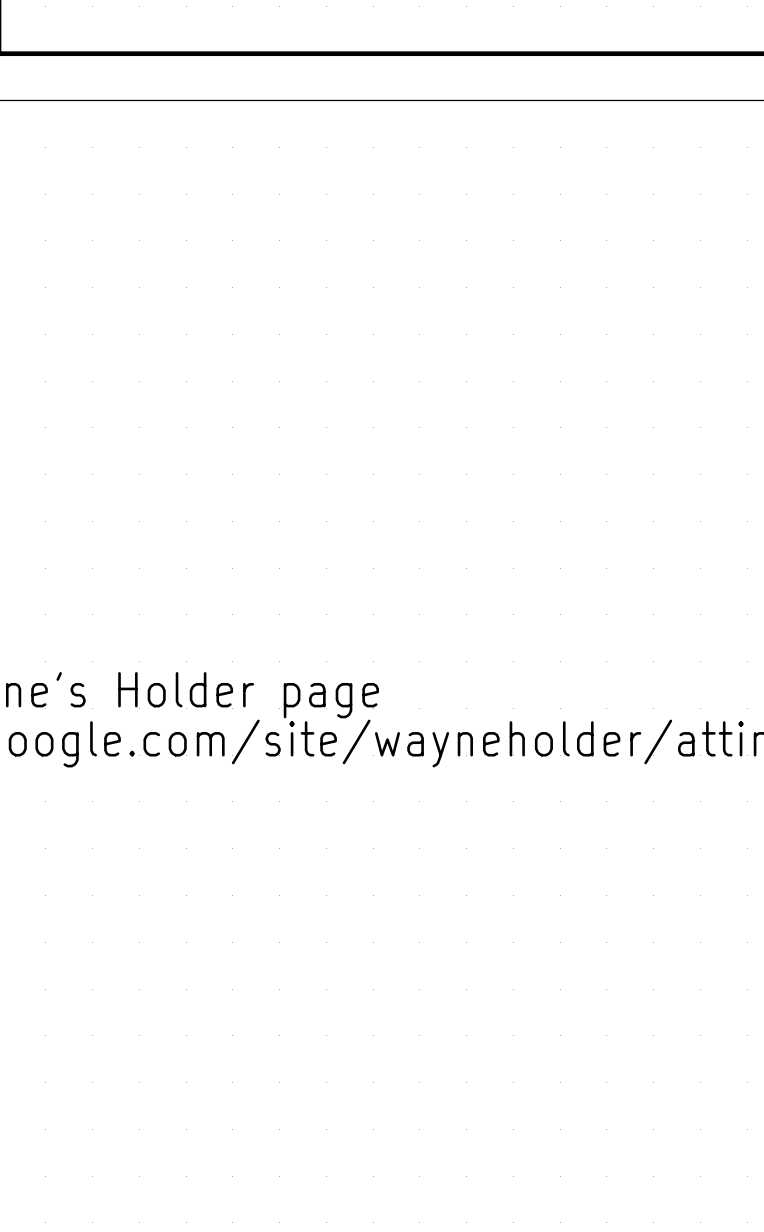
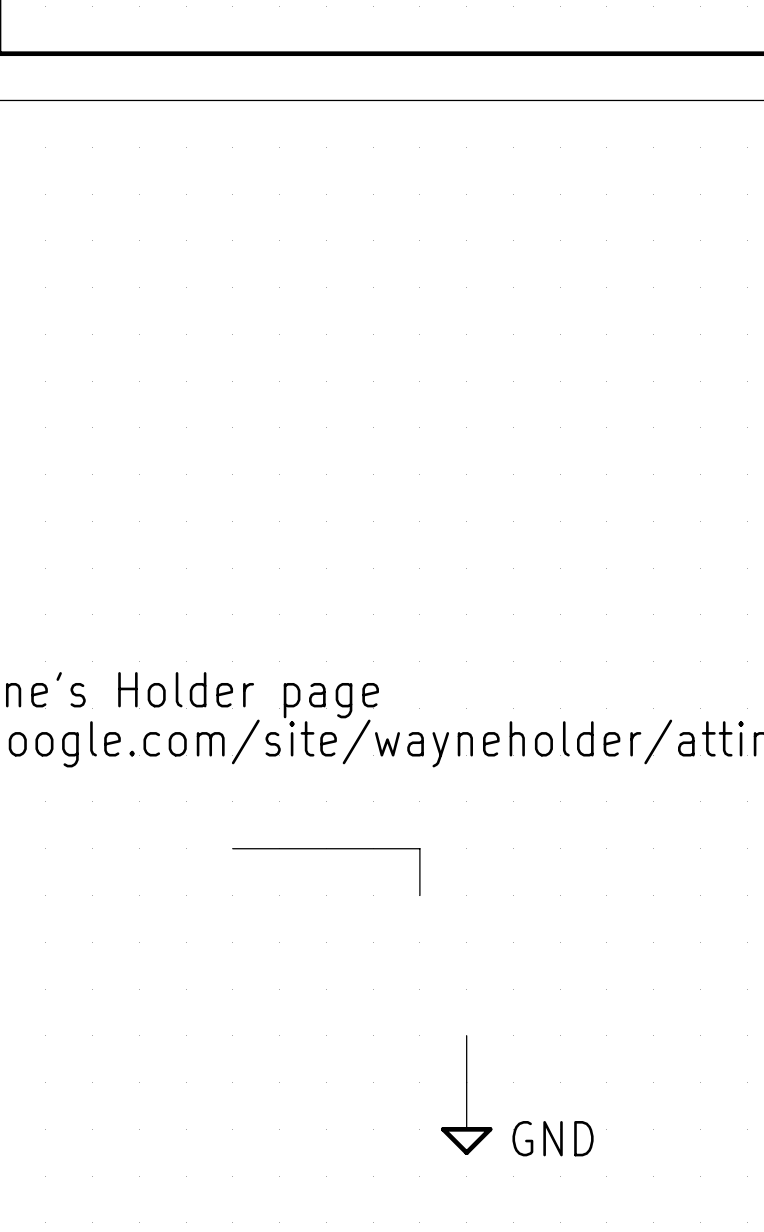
wire: none -> (232, 848) (419, 848) (419, 895)
wire: none -> (466, 1035) (466, 1082)
power symbol: none -> GND (466, 1118)

